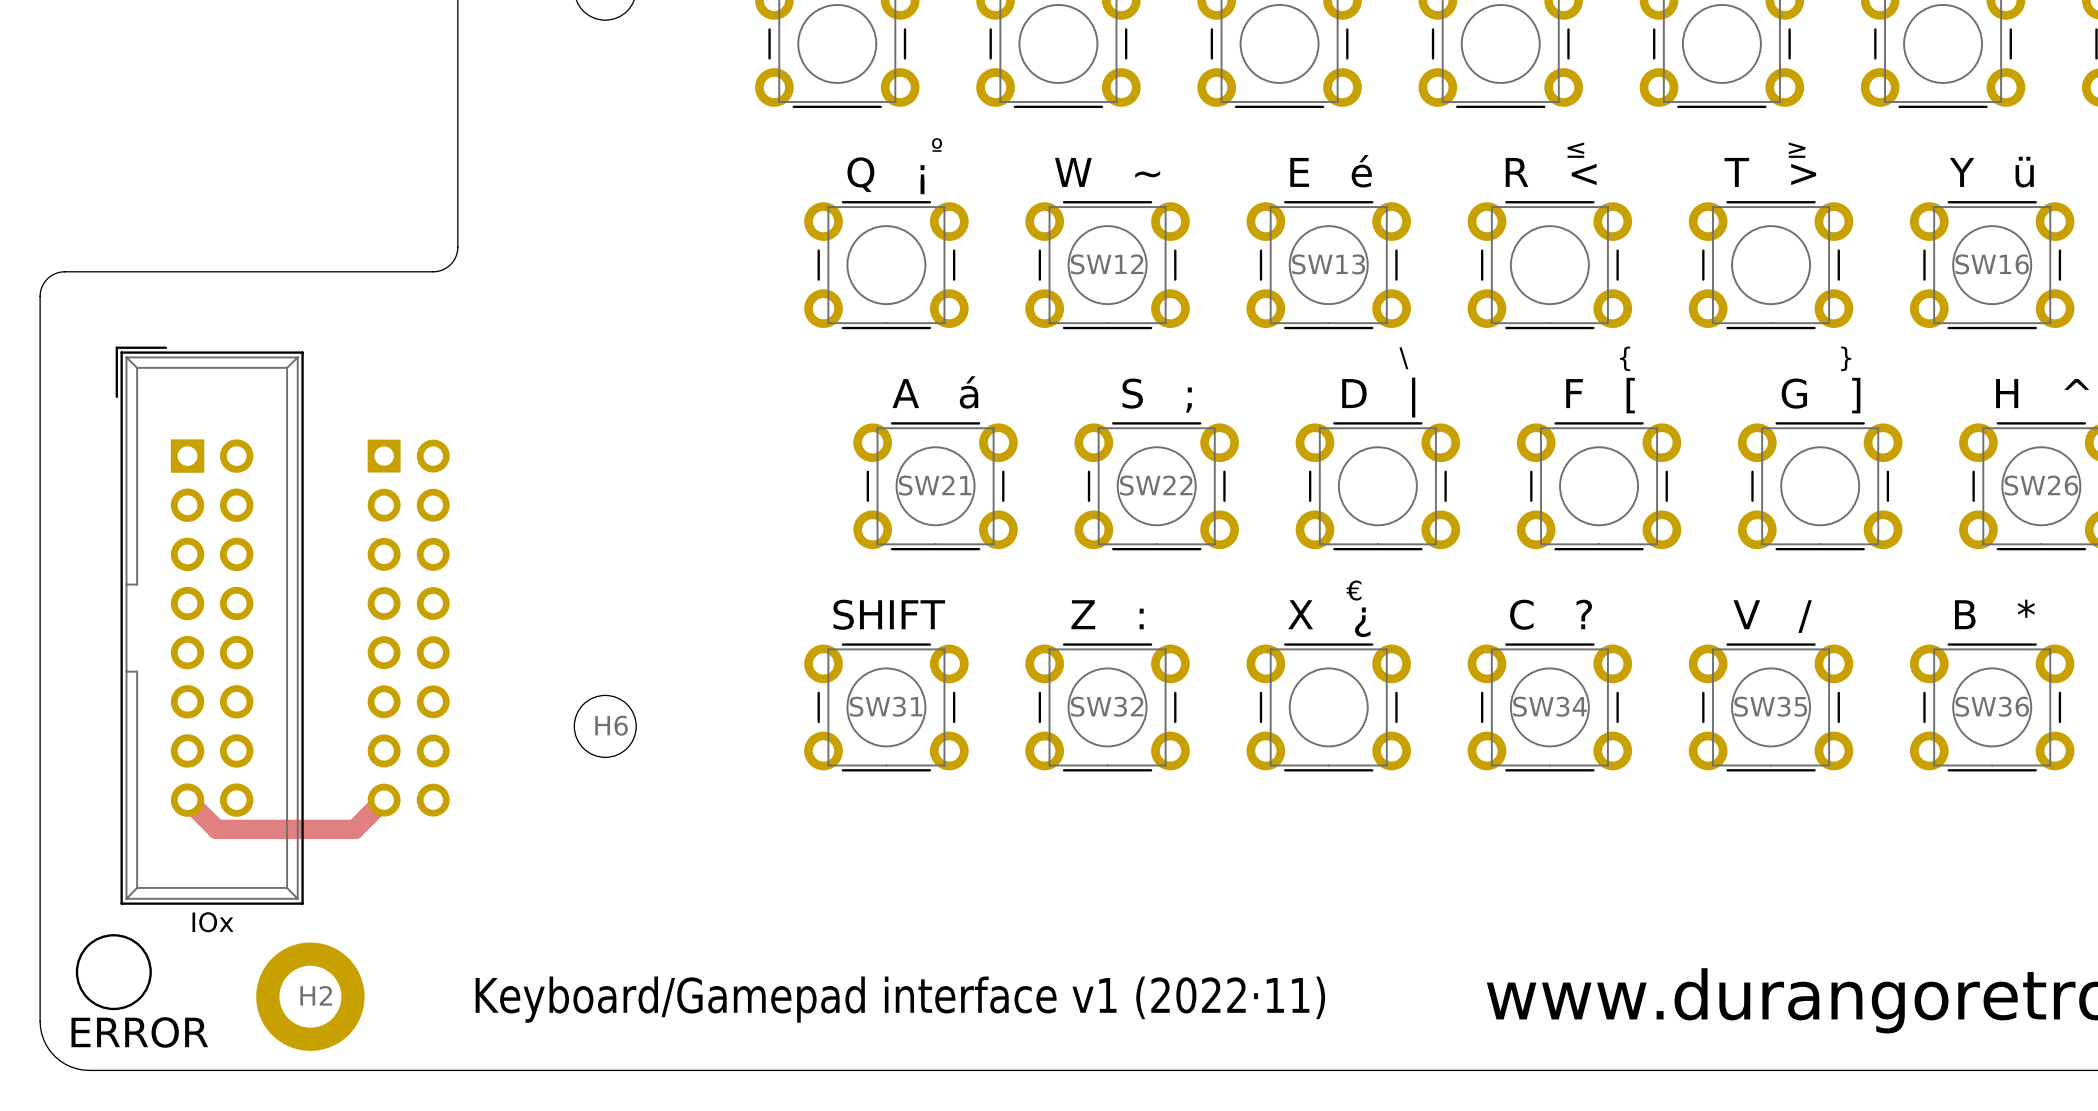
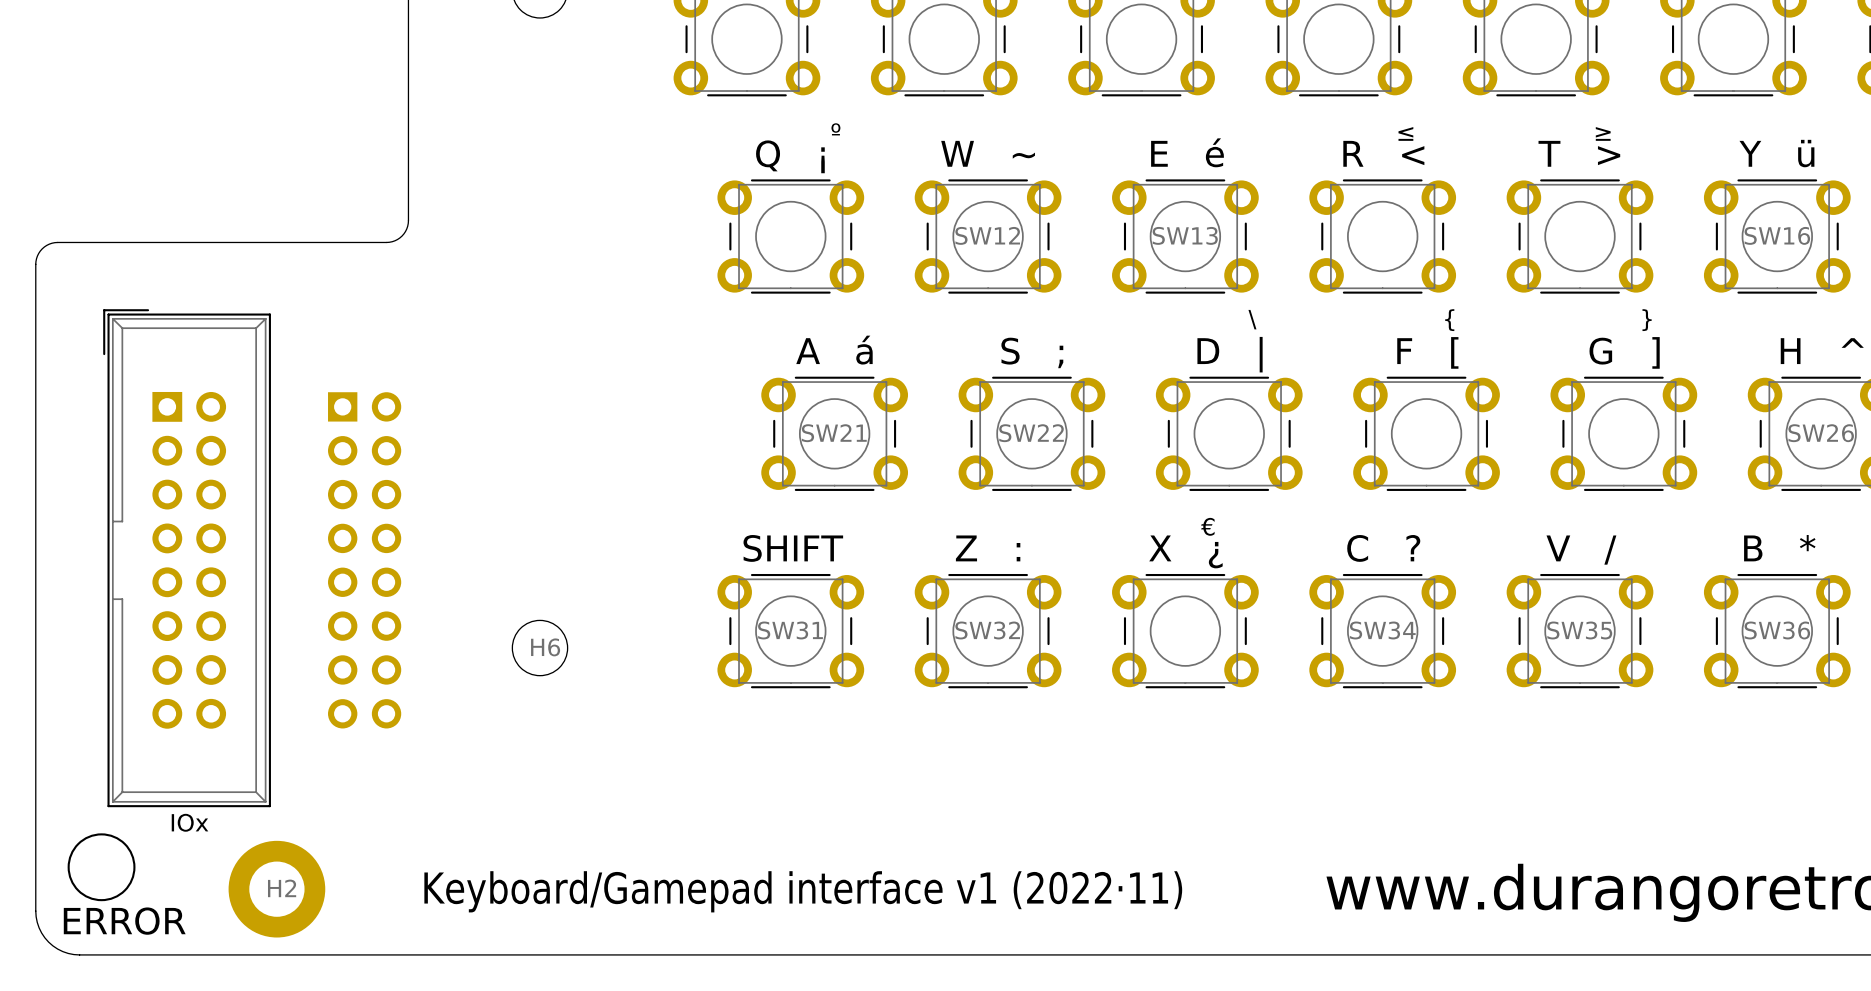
track: (187, 800) (216, 829) (354, 829) (384, 800) -> none

